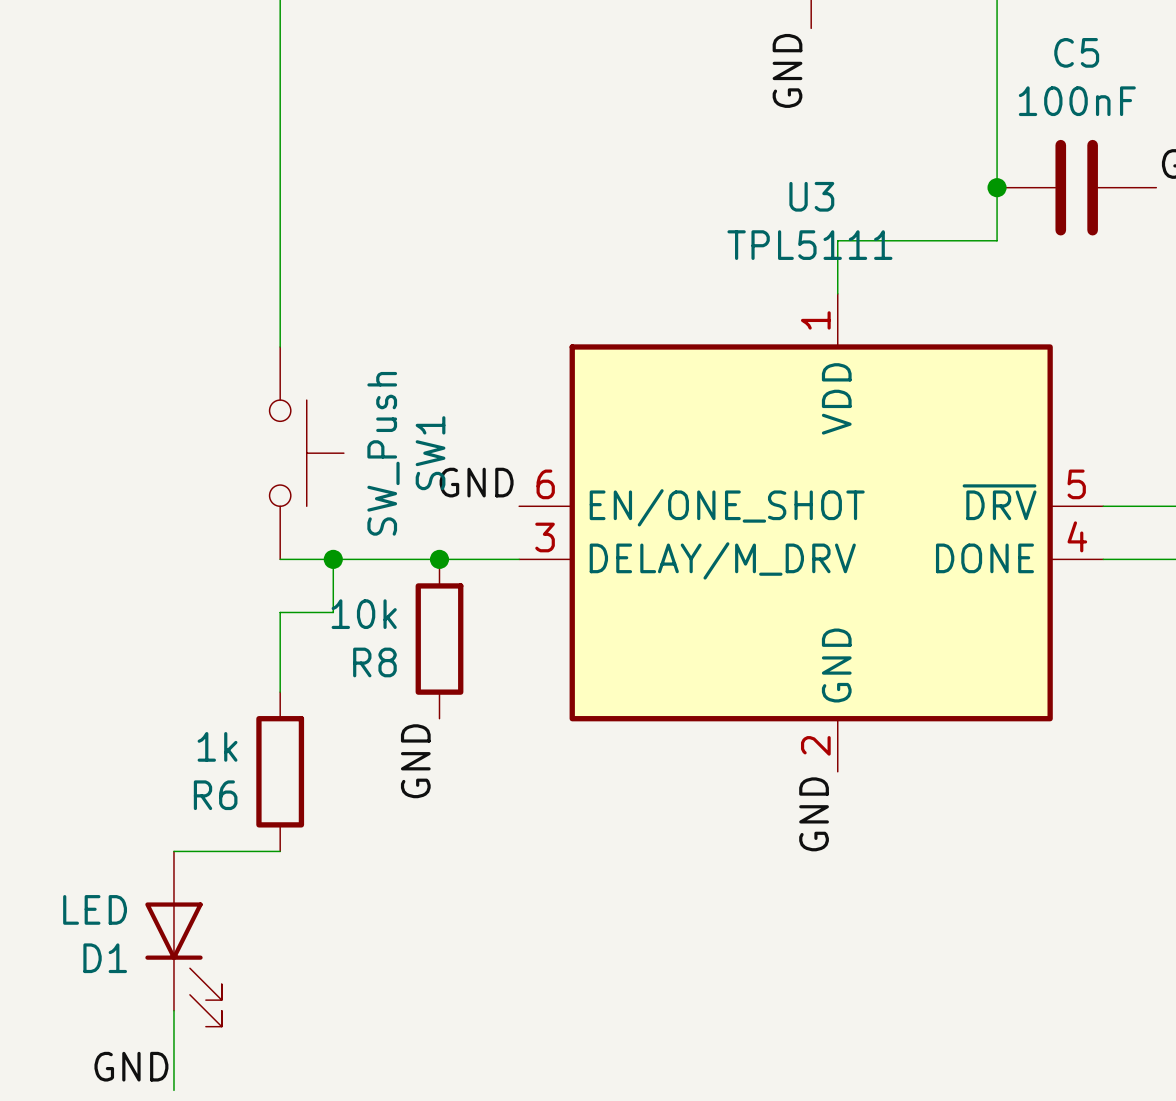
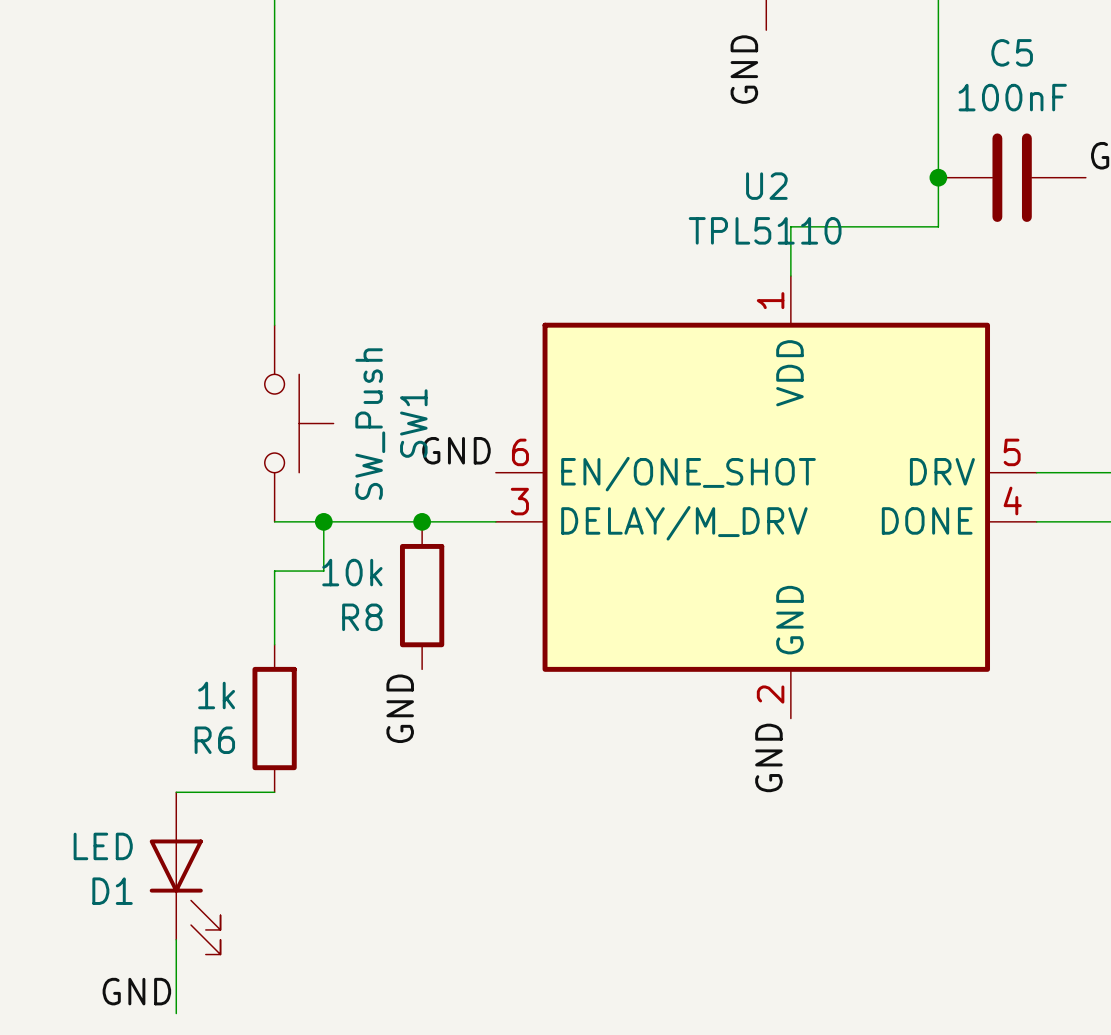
U3 name: U3 (811, 196) -> U2 (766, 186)
U3 value: TPL5111 (809, 245) -> TPL5110 (765, 230)
U3 pin name: ~{DRV} (999, 502) -> DRV (942, 471)

